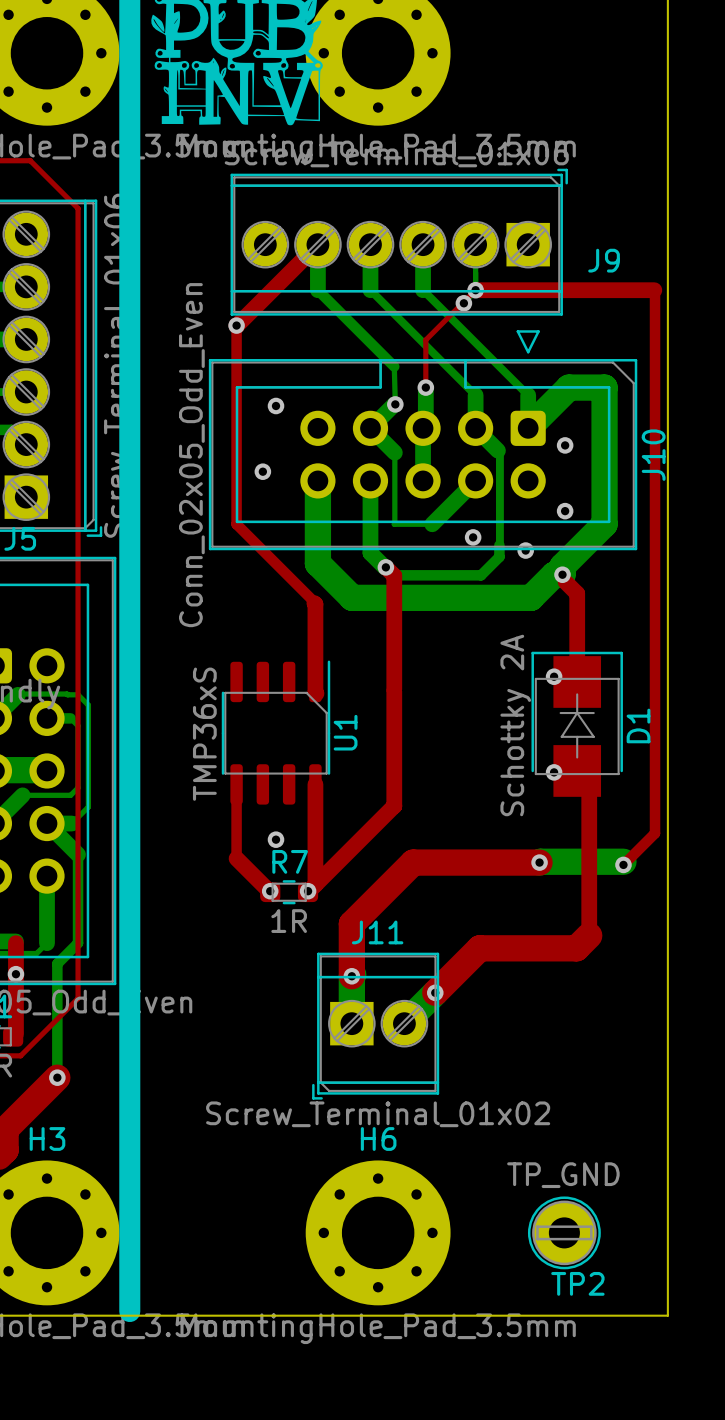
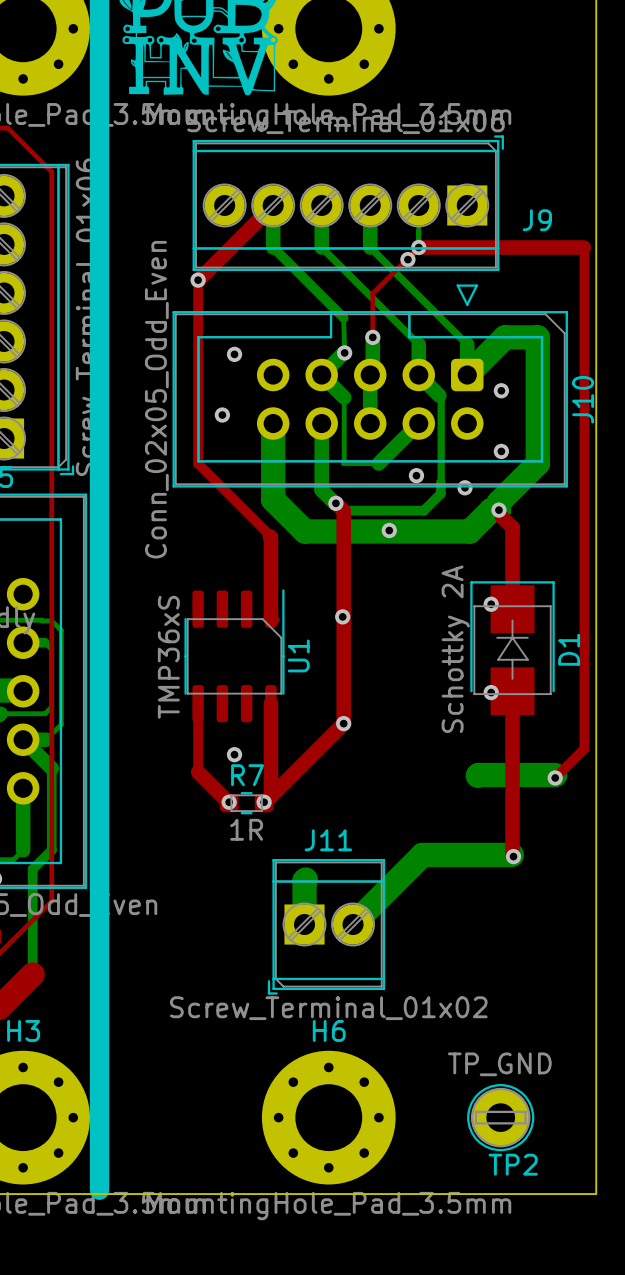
via: none -> (389, 530)
via: none -> (342, 616)
top track: (577, 770) (589, 782) (589, 935) (576, 948) (479, 948) (435, 992) -> (512, 691) (513, 856)
via: none -> (343, 723)
top track: (539, 862) (413, 862) (351, 923) (351, 976) -> none
via: (539, 862) -> none
bottom track: none -> (513, 856) (511, 854) (422, 854) (381, 896)
via: none -> (513, 856)
via: (351, 976) -> none
via: (435, 992) -> none
via: (57, 1077) -> none

